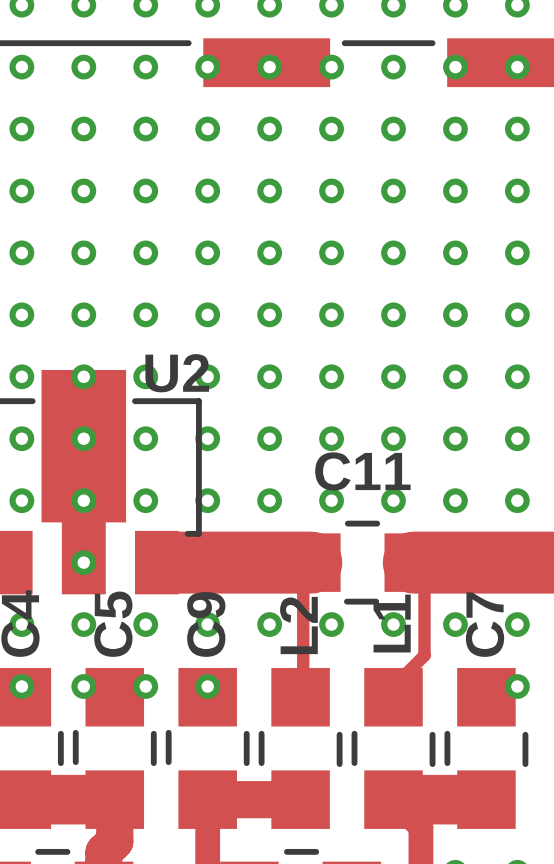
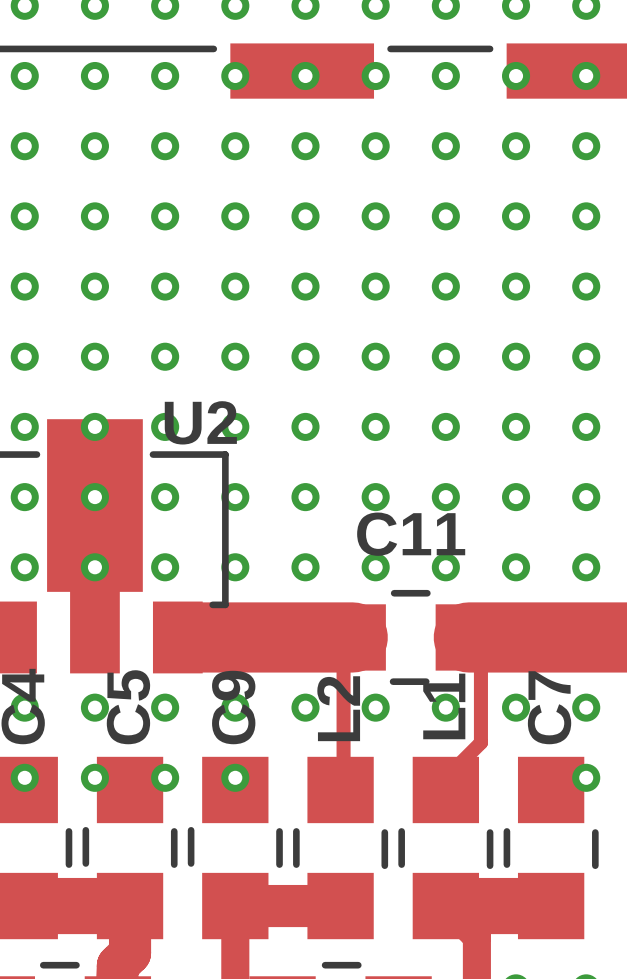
via: (83, 562) -> none

